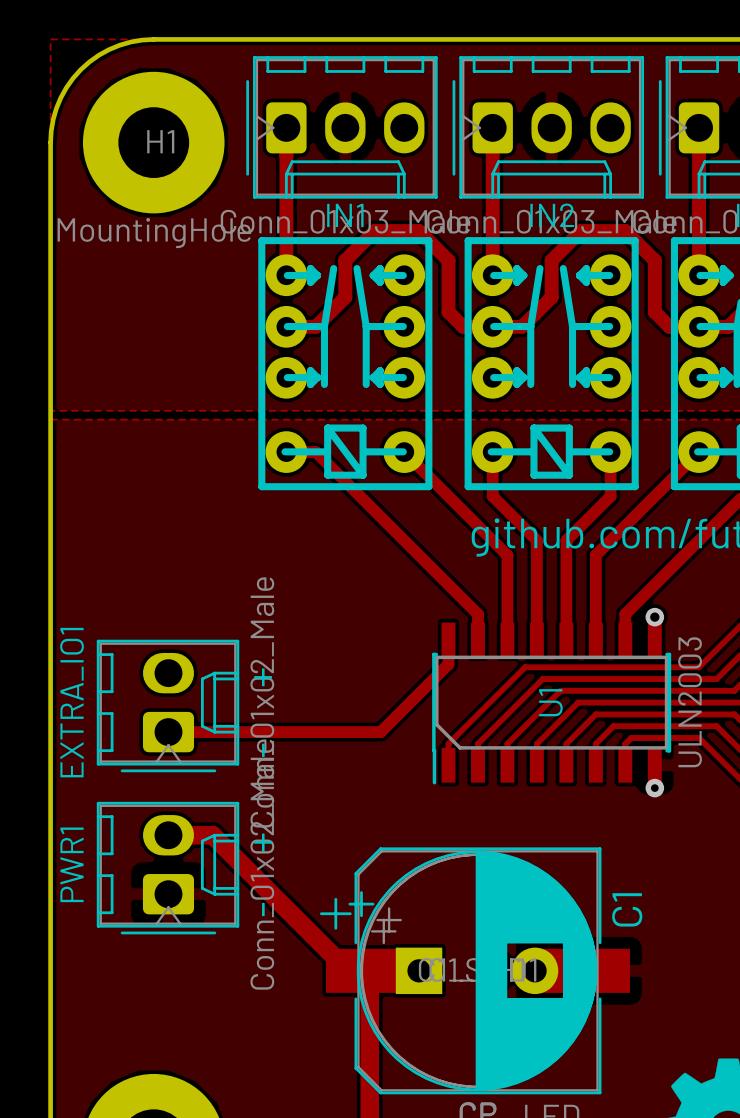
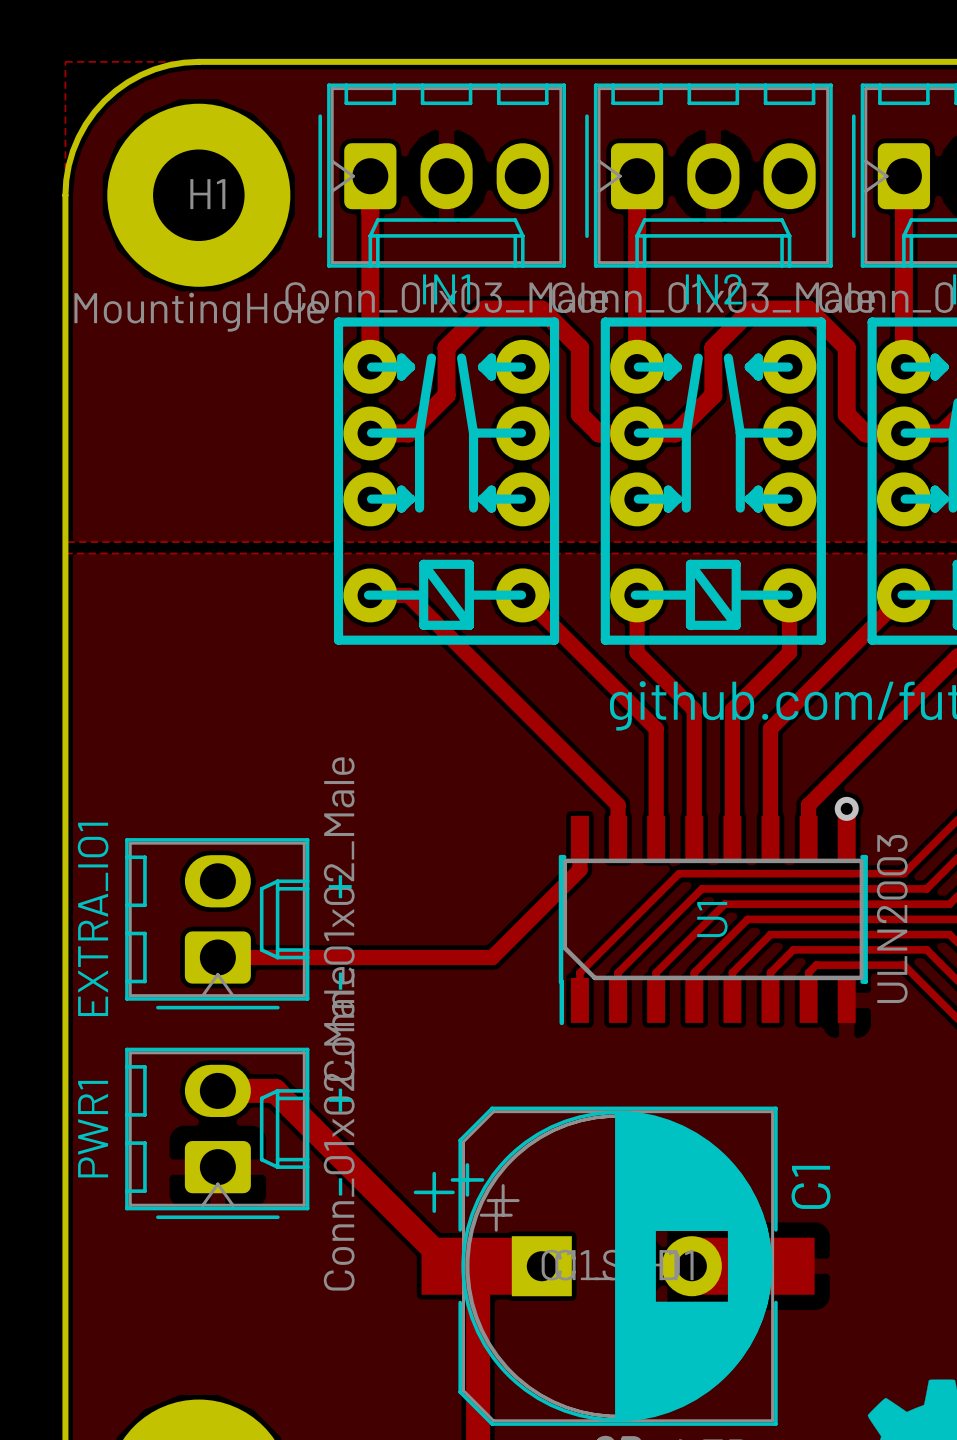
via: (654, 788) -> none

